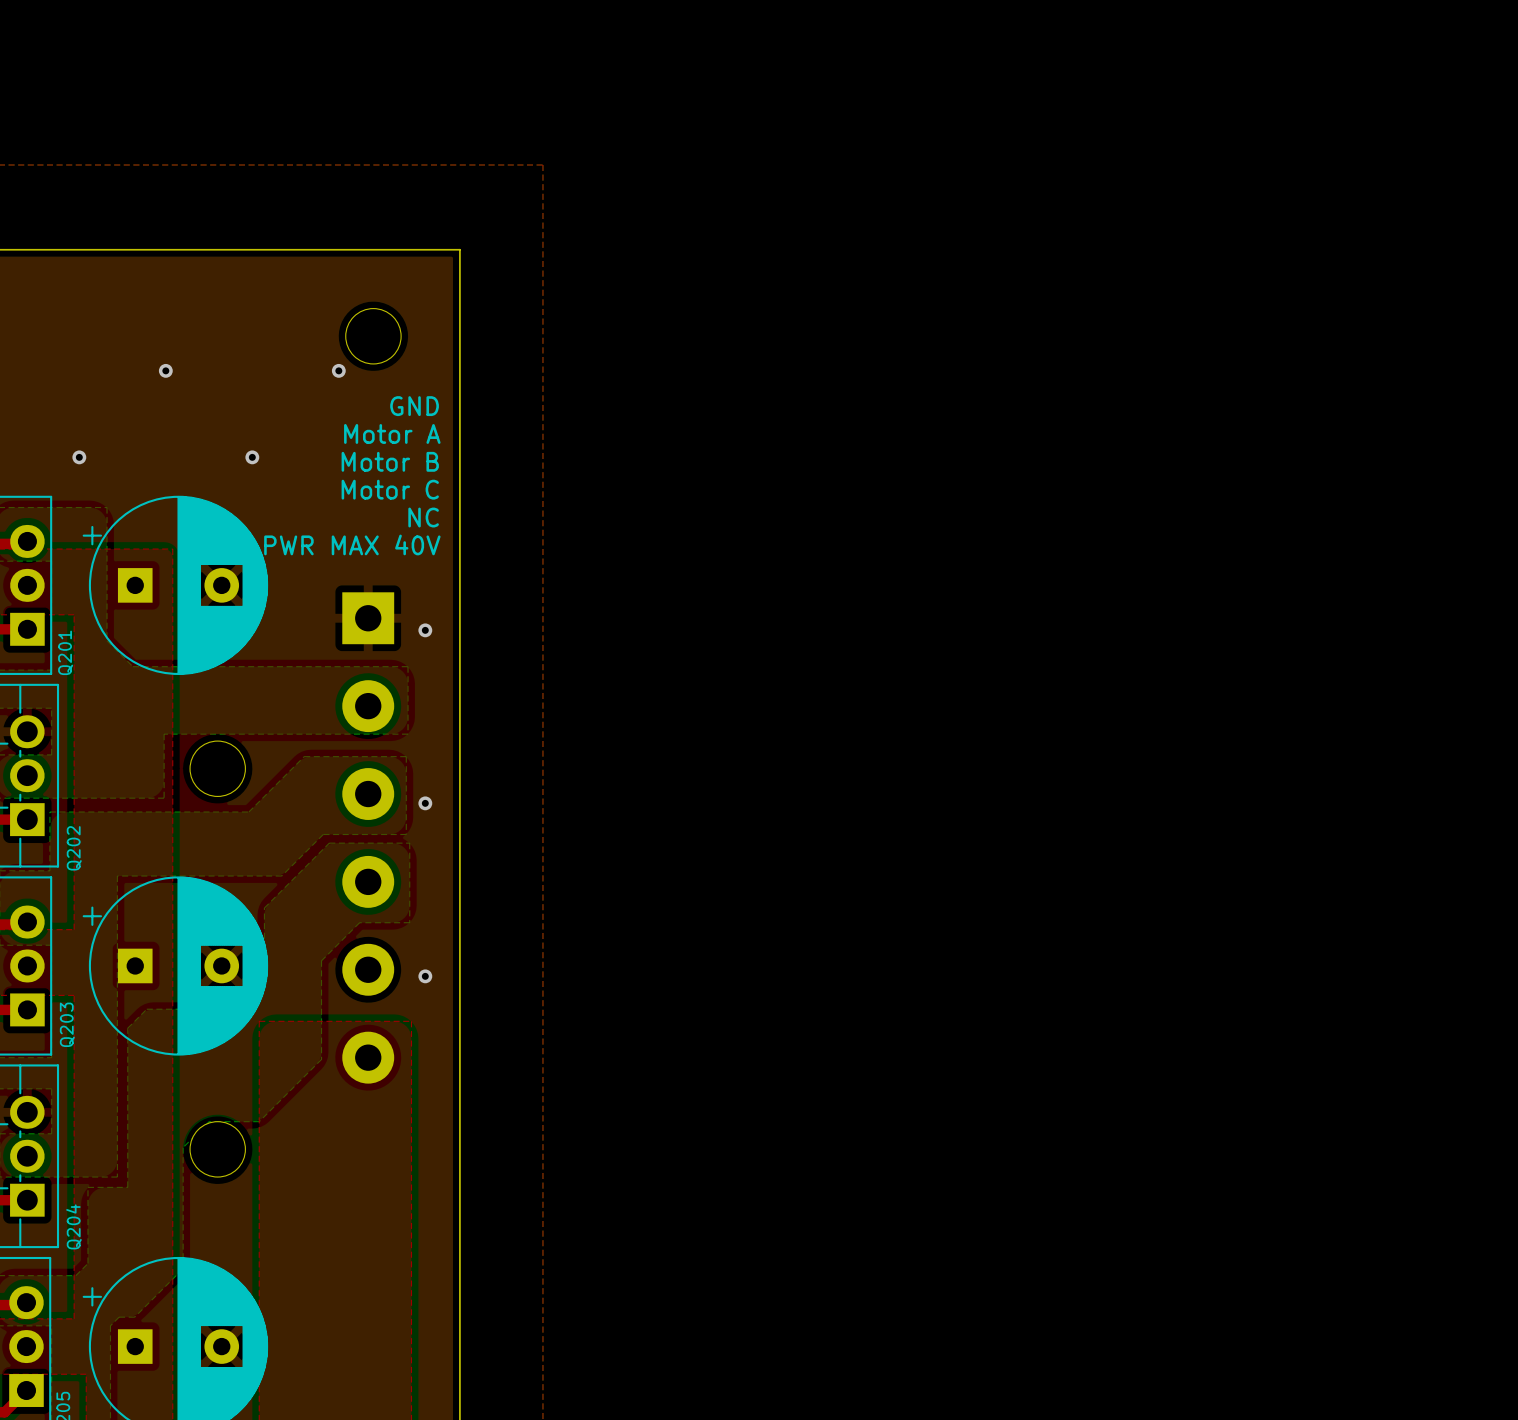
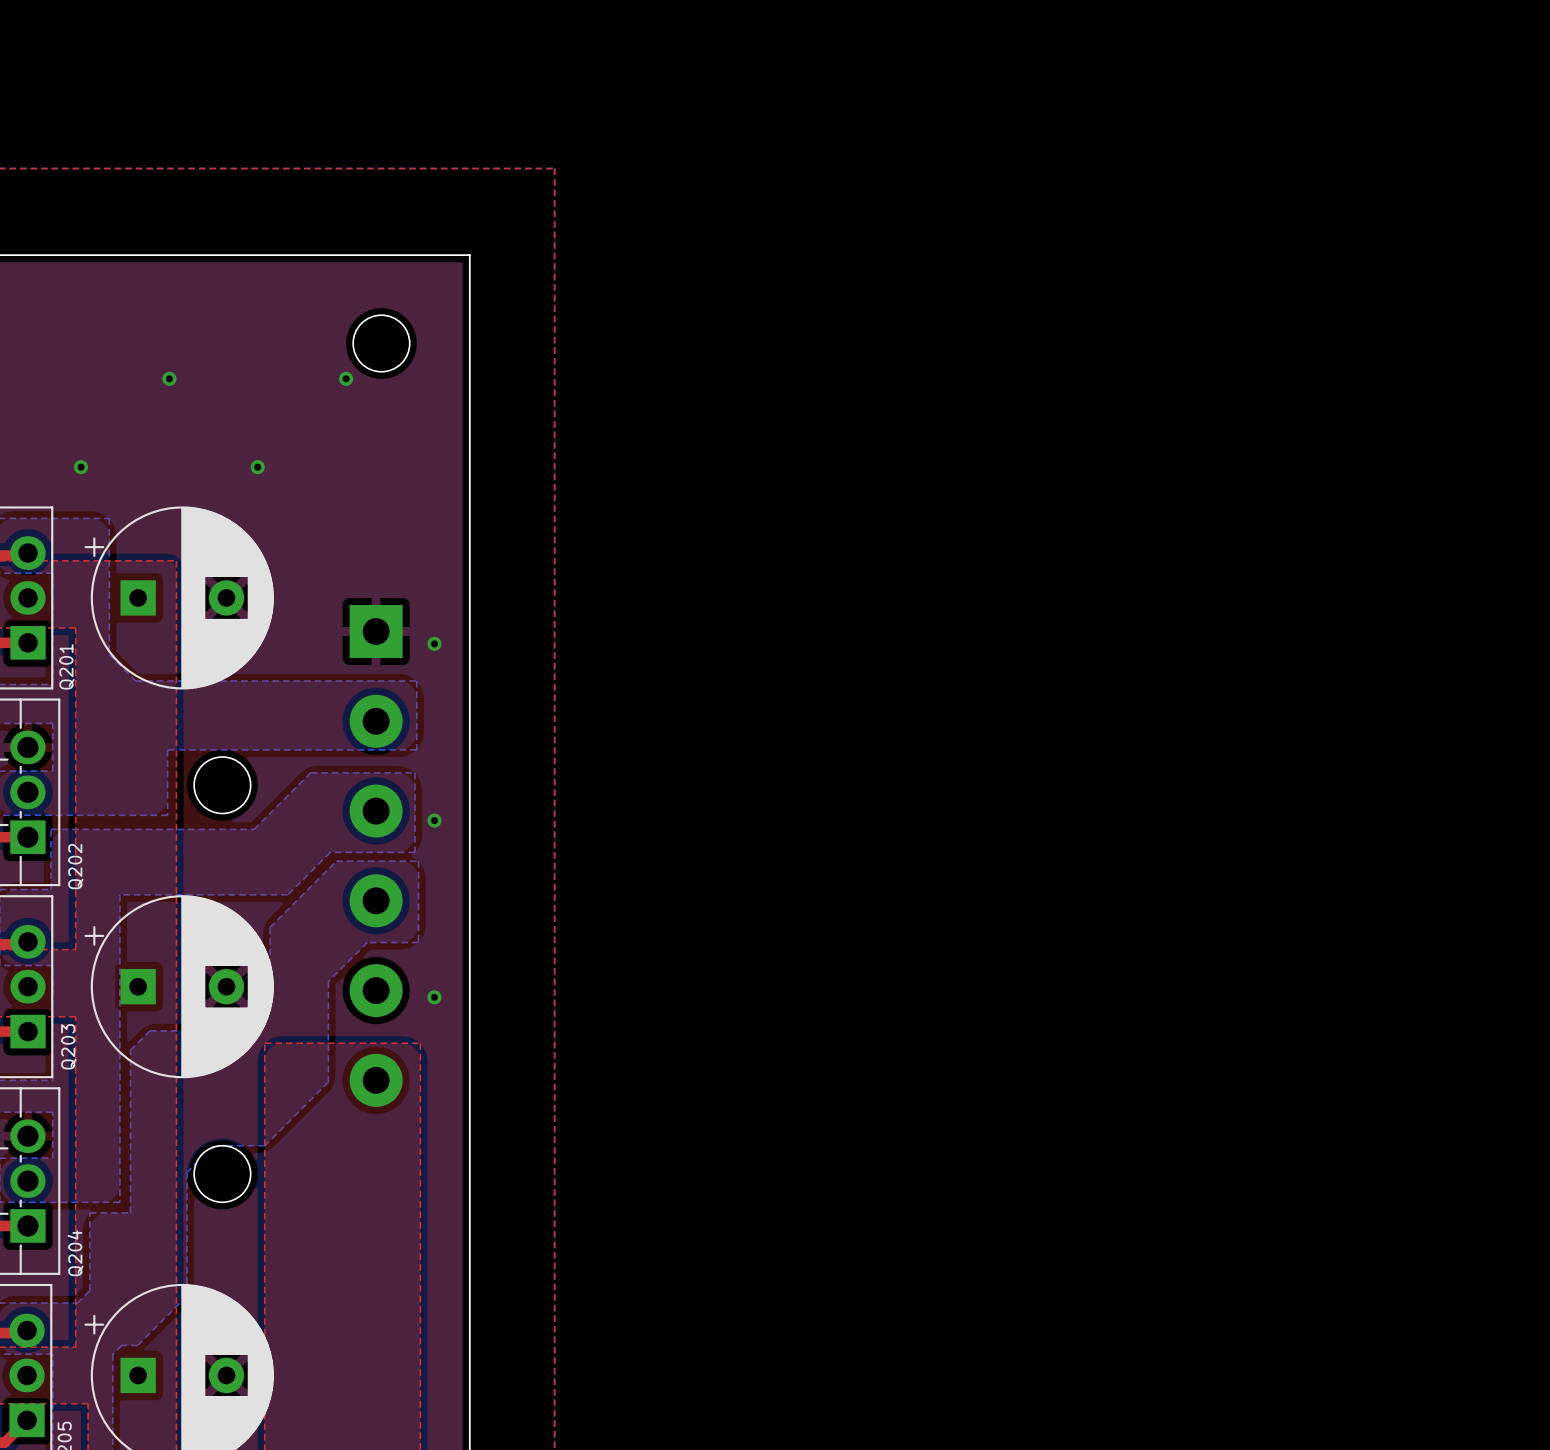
text: GND (414, 406) -> none
text: Motor A (392, 433) -> none
text: Motor B (390, 461) -> none
text: Motor C (390, 489) -> none
text: NC (423, 517) -> none
text: PWR MAX 40V (352, 544) -> none

